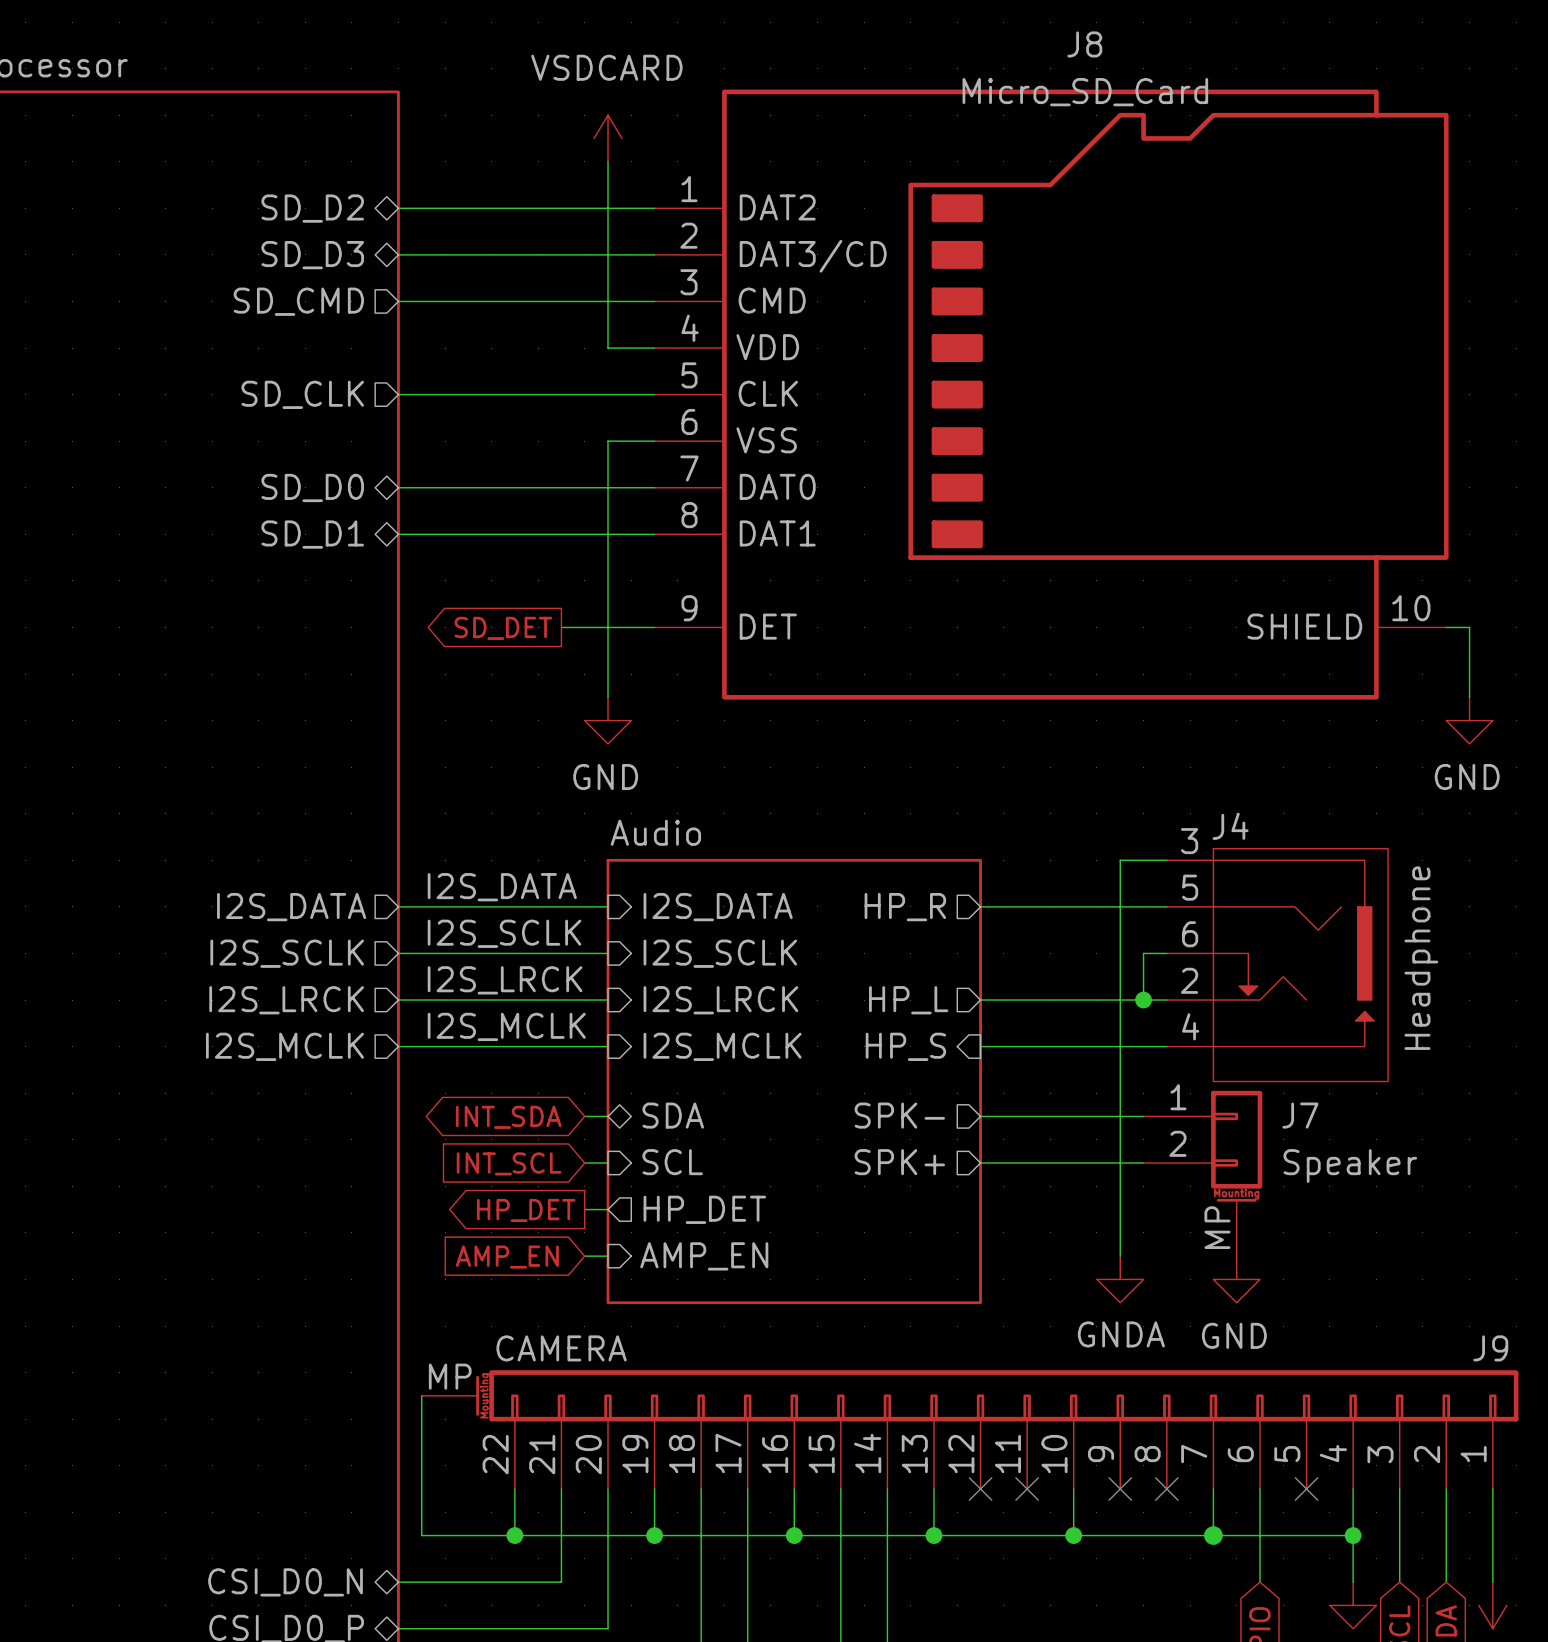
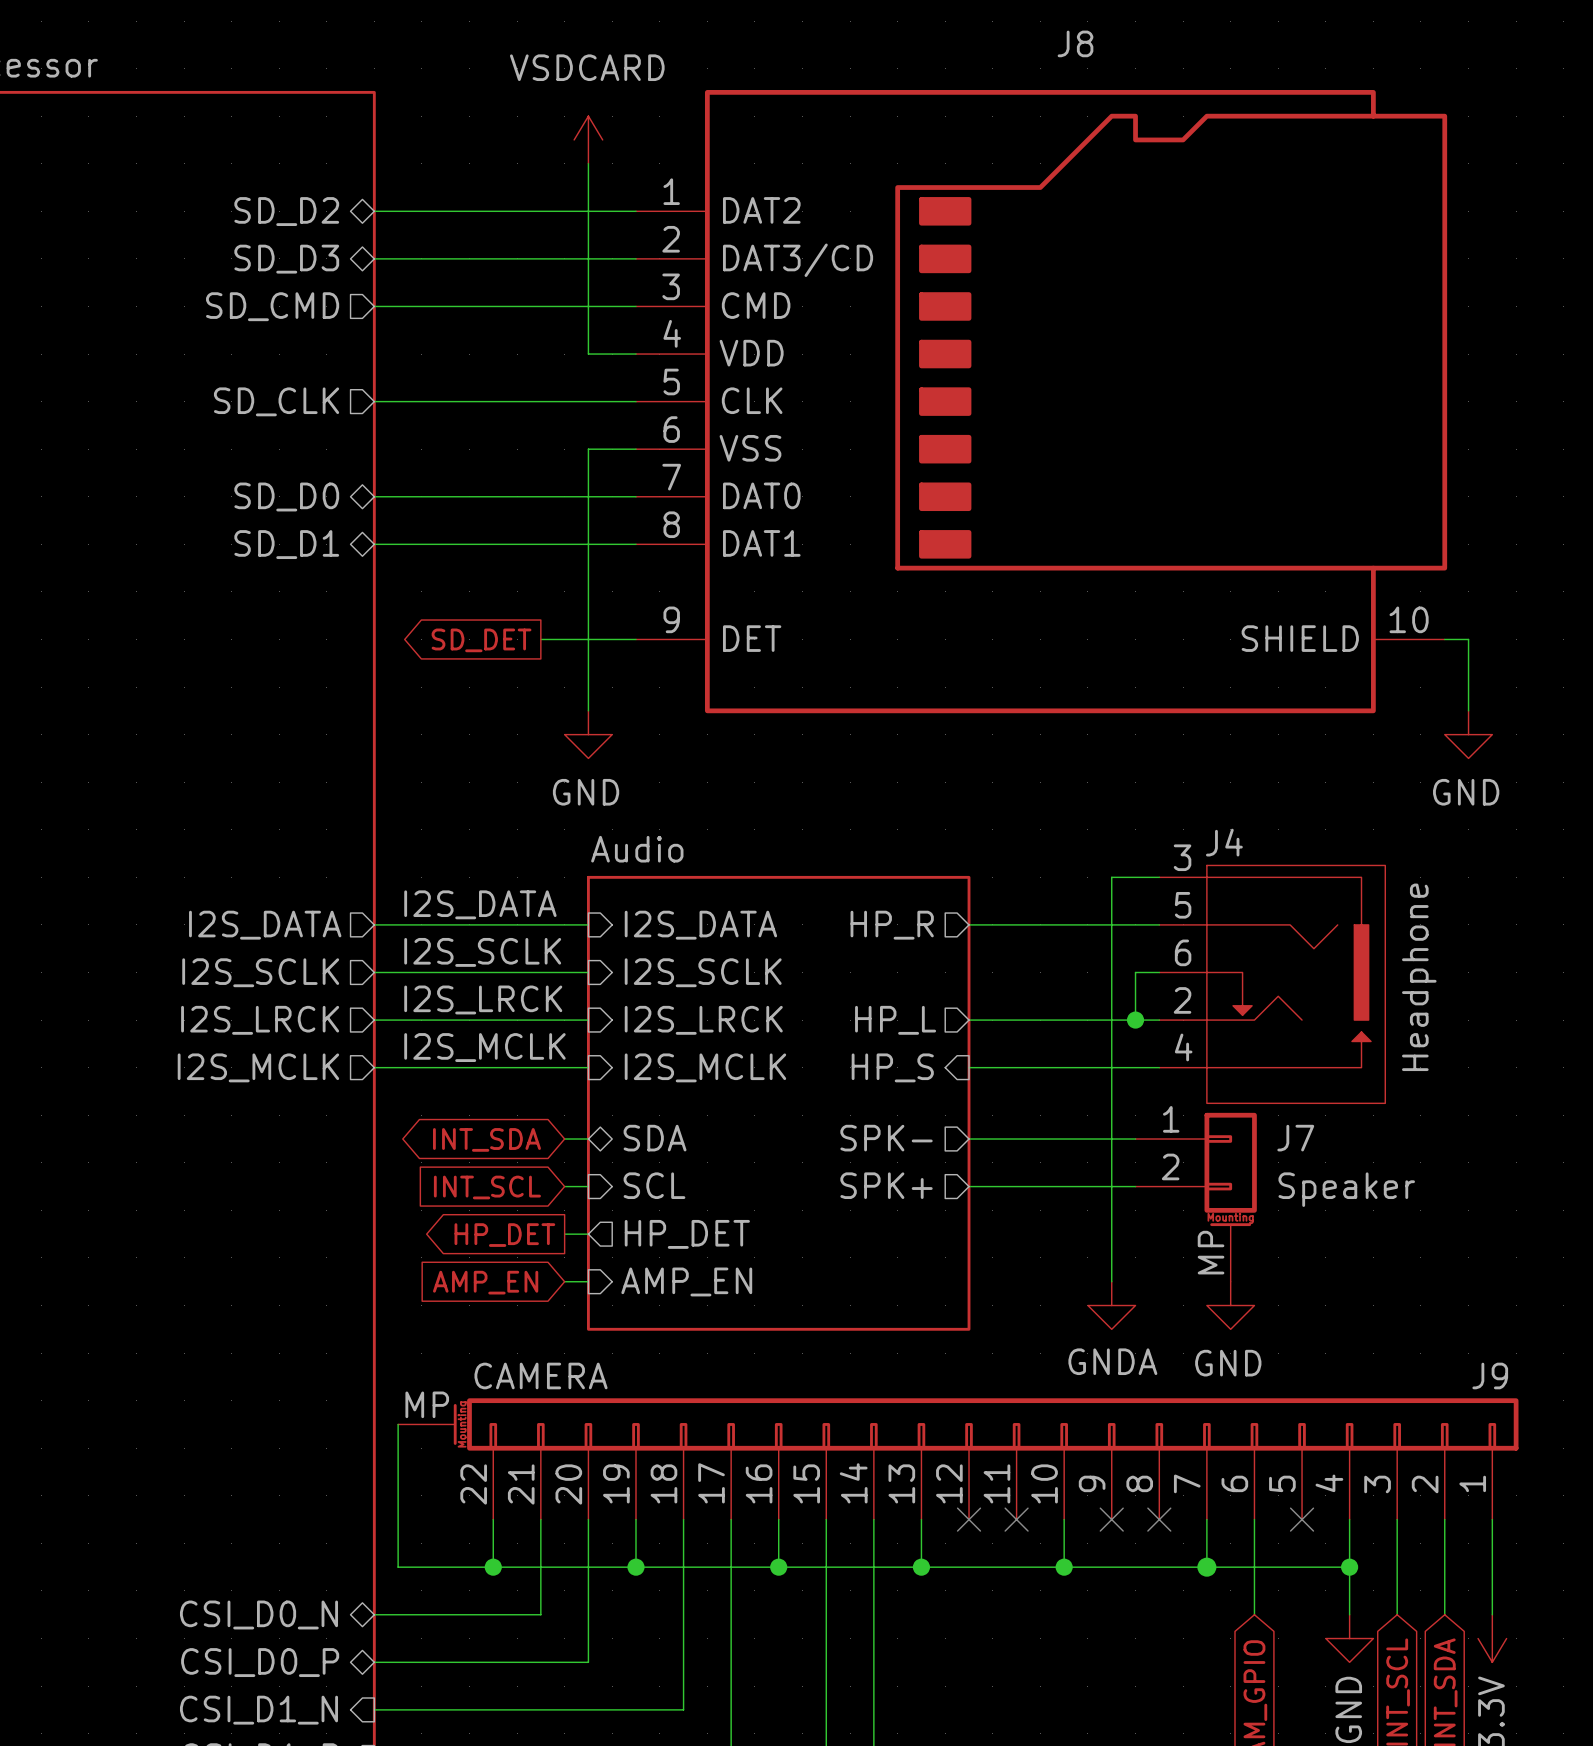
J8 value: Micro_SD_Card (1085, 92) -> none

